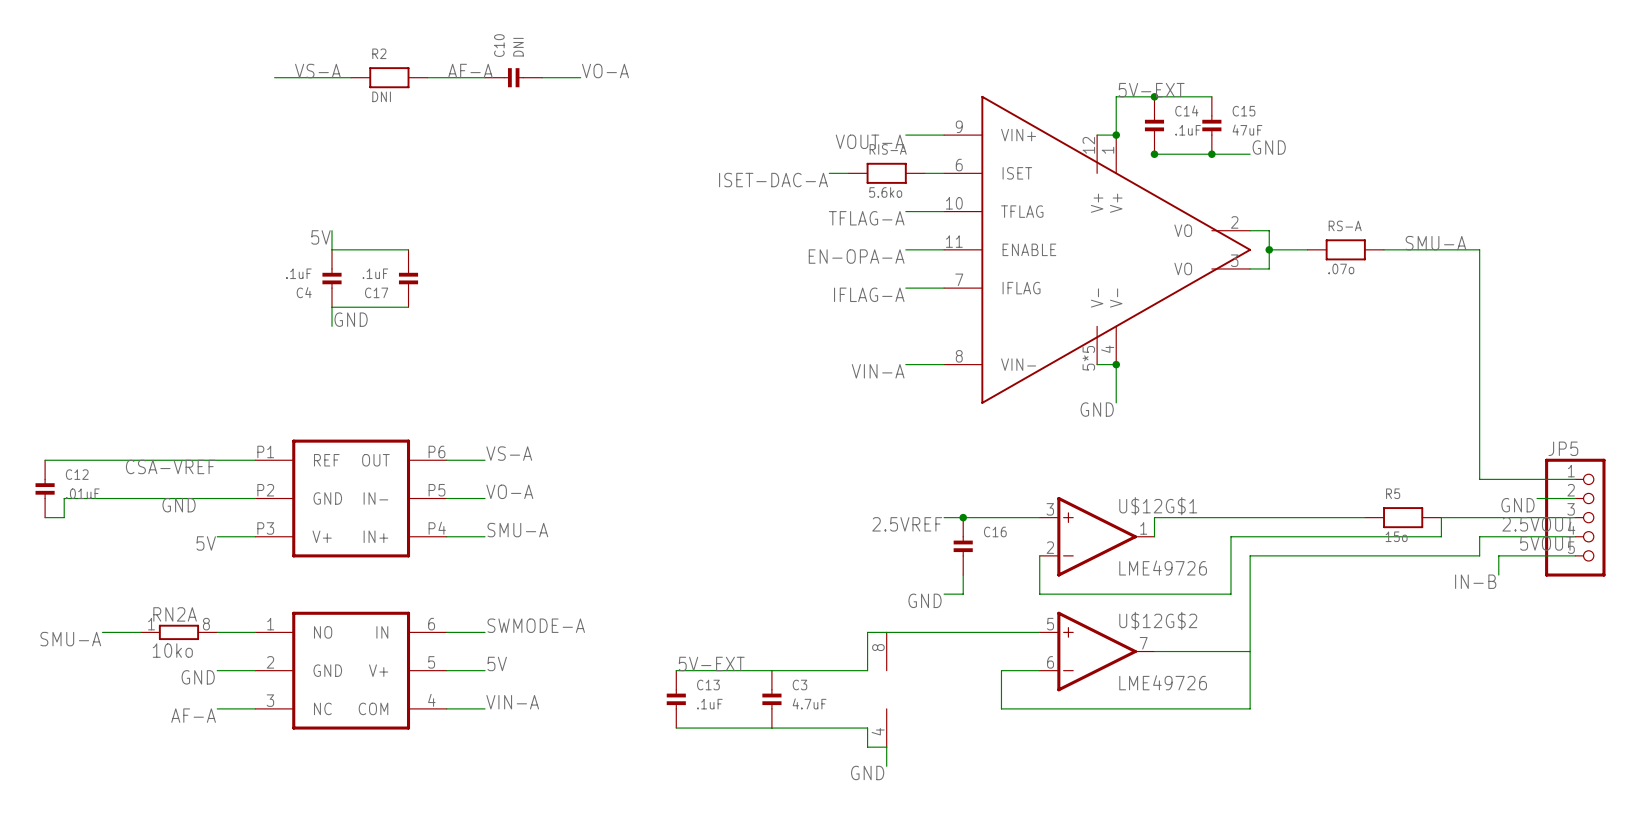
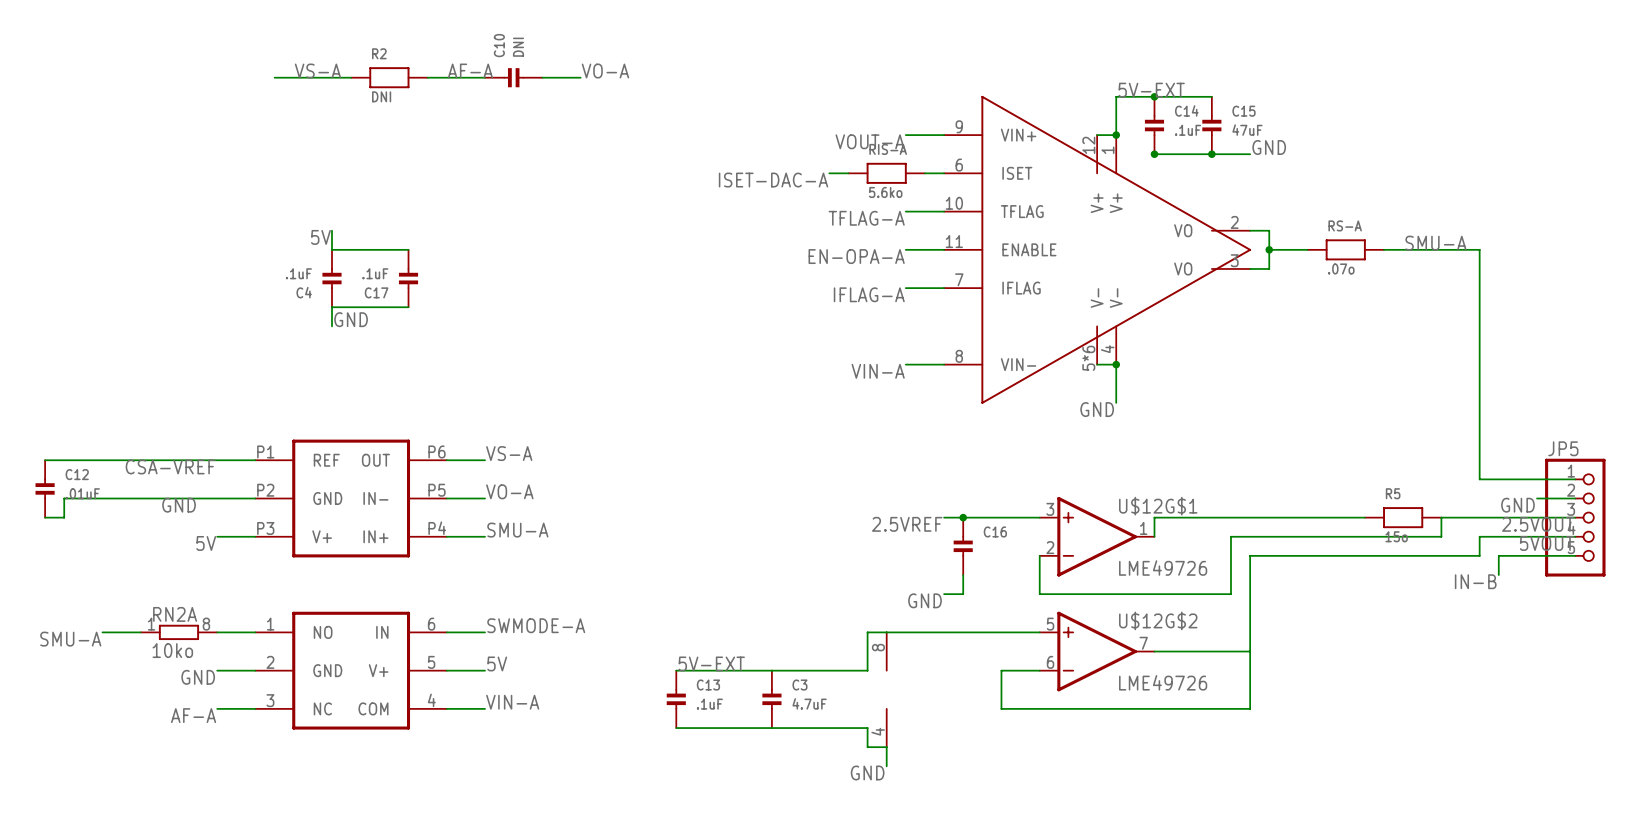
part pin number: 5*5 (1088, 358) -> 5*6 (1088, 358)

